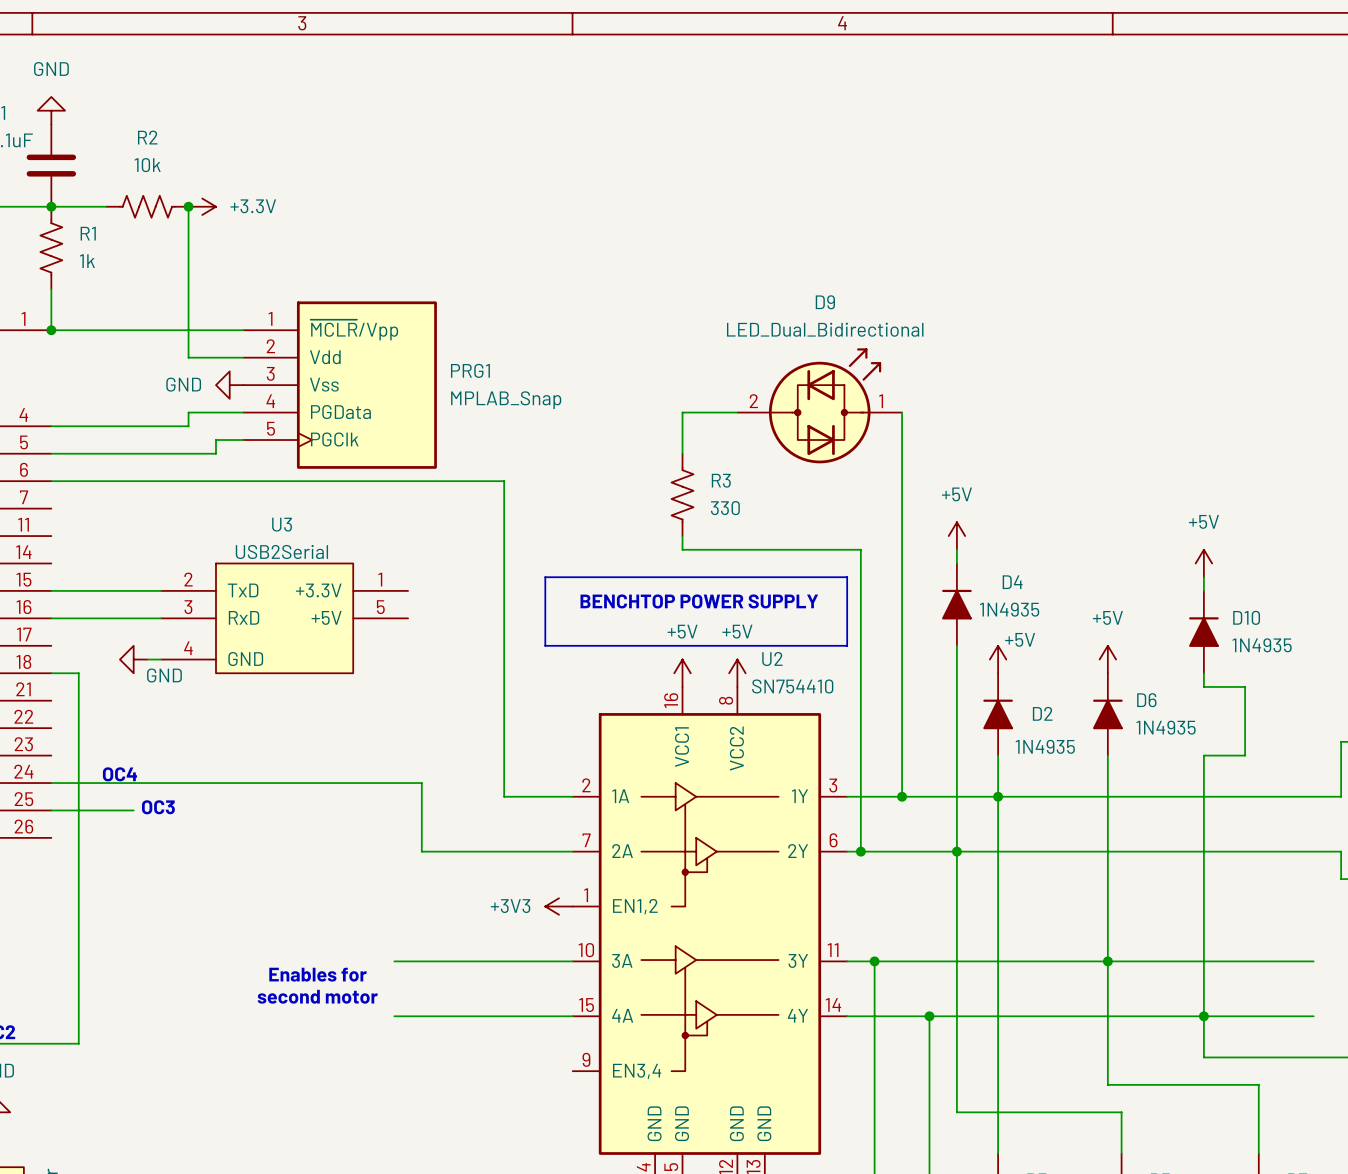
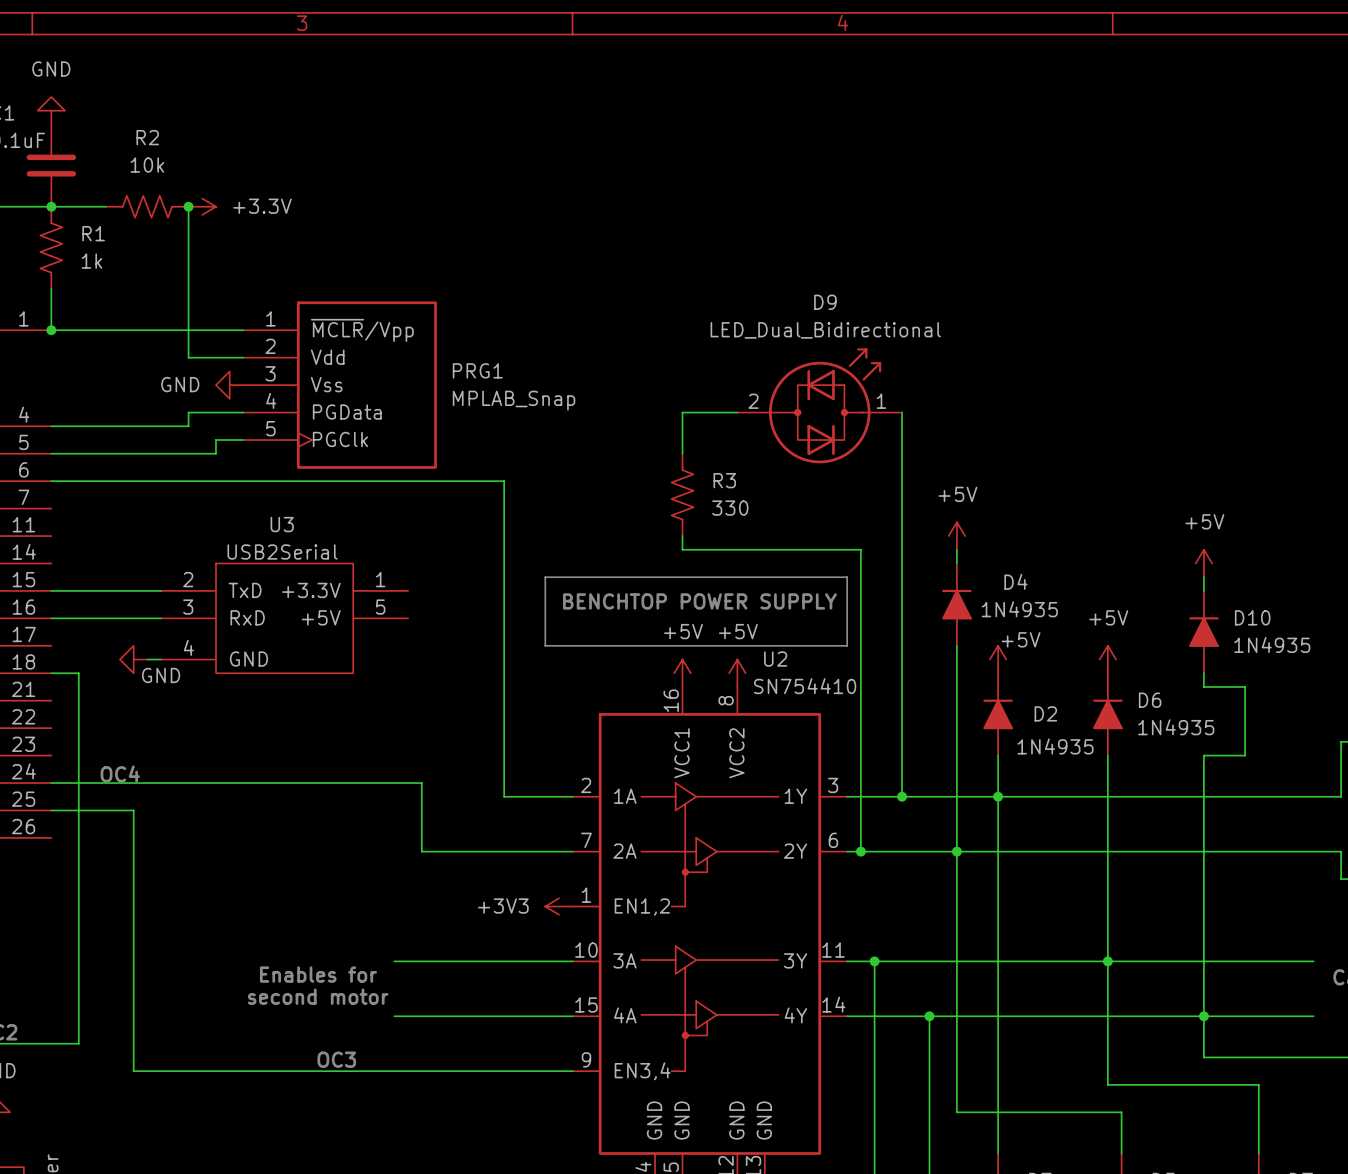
text: OC3 (158, 807) -> none
wire: none -> (133, 810) (133, 1071) (572, 1071)
text: none -> OC3 (336, 1059)

